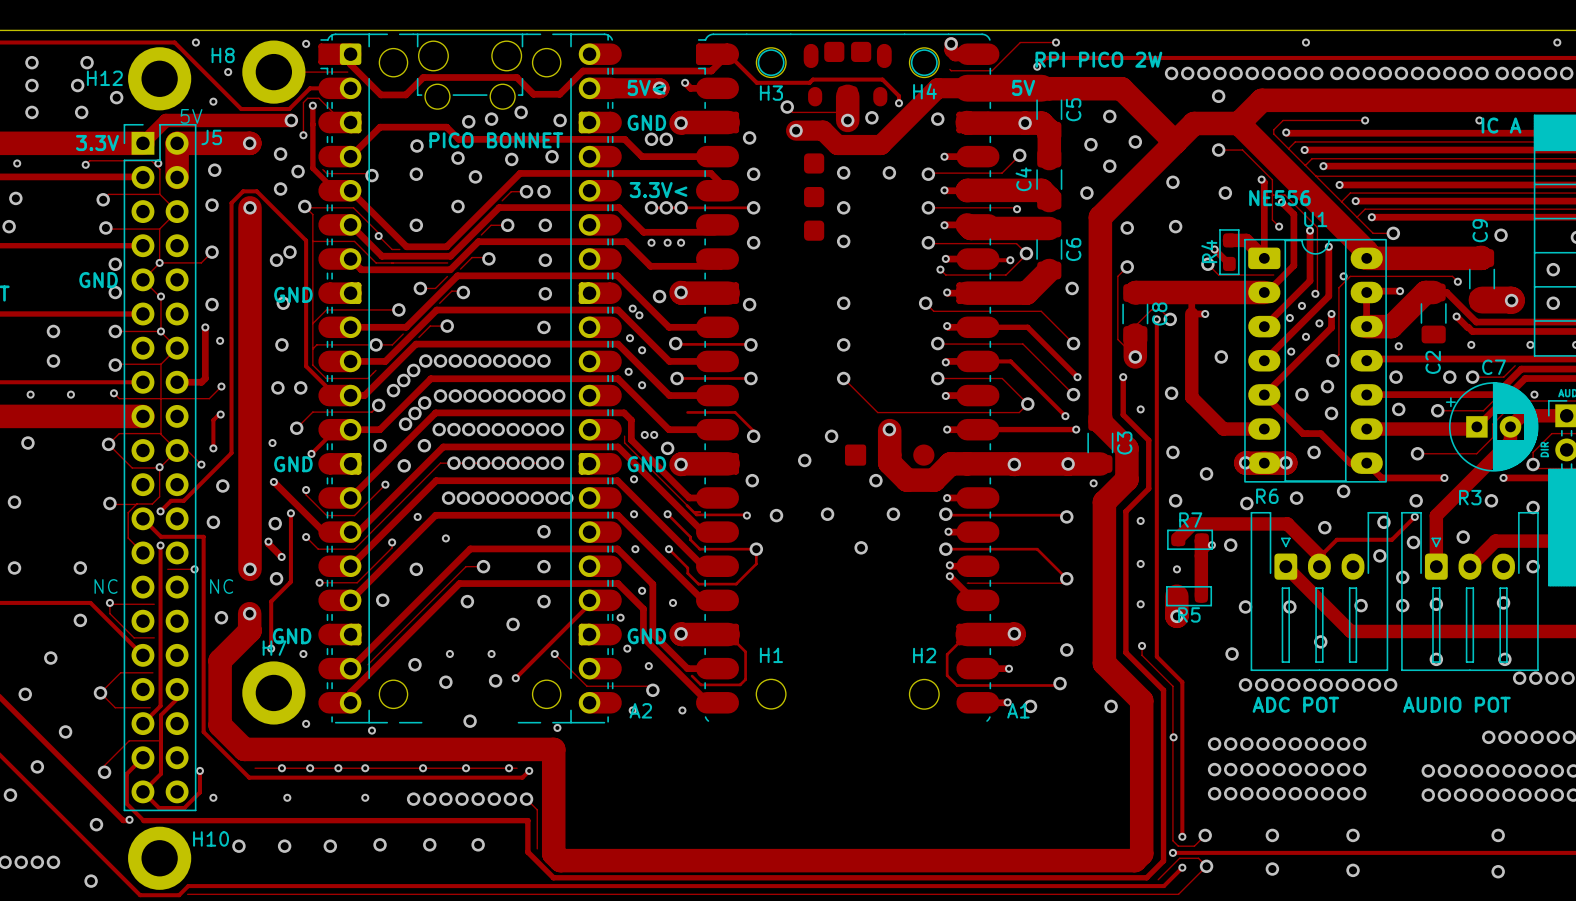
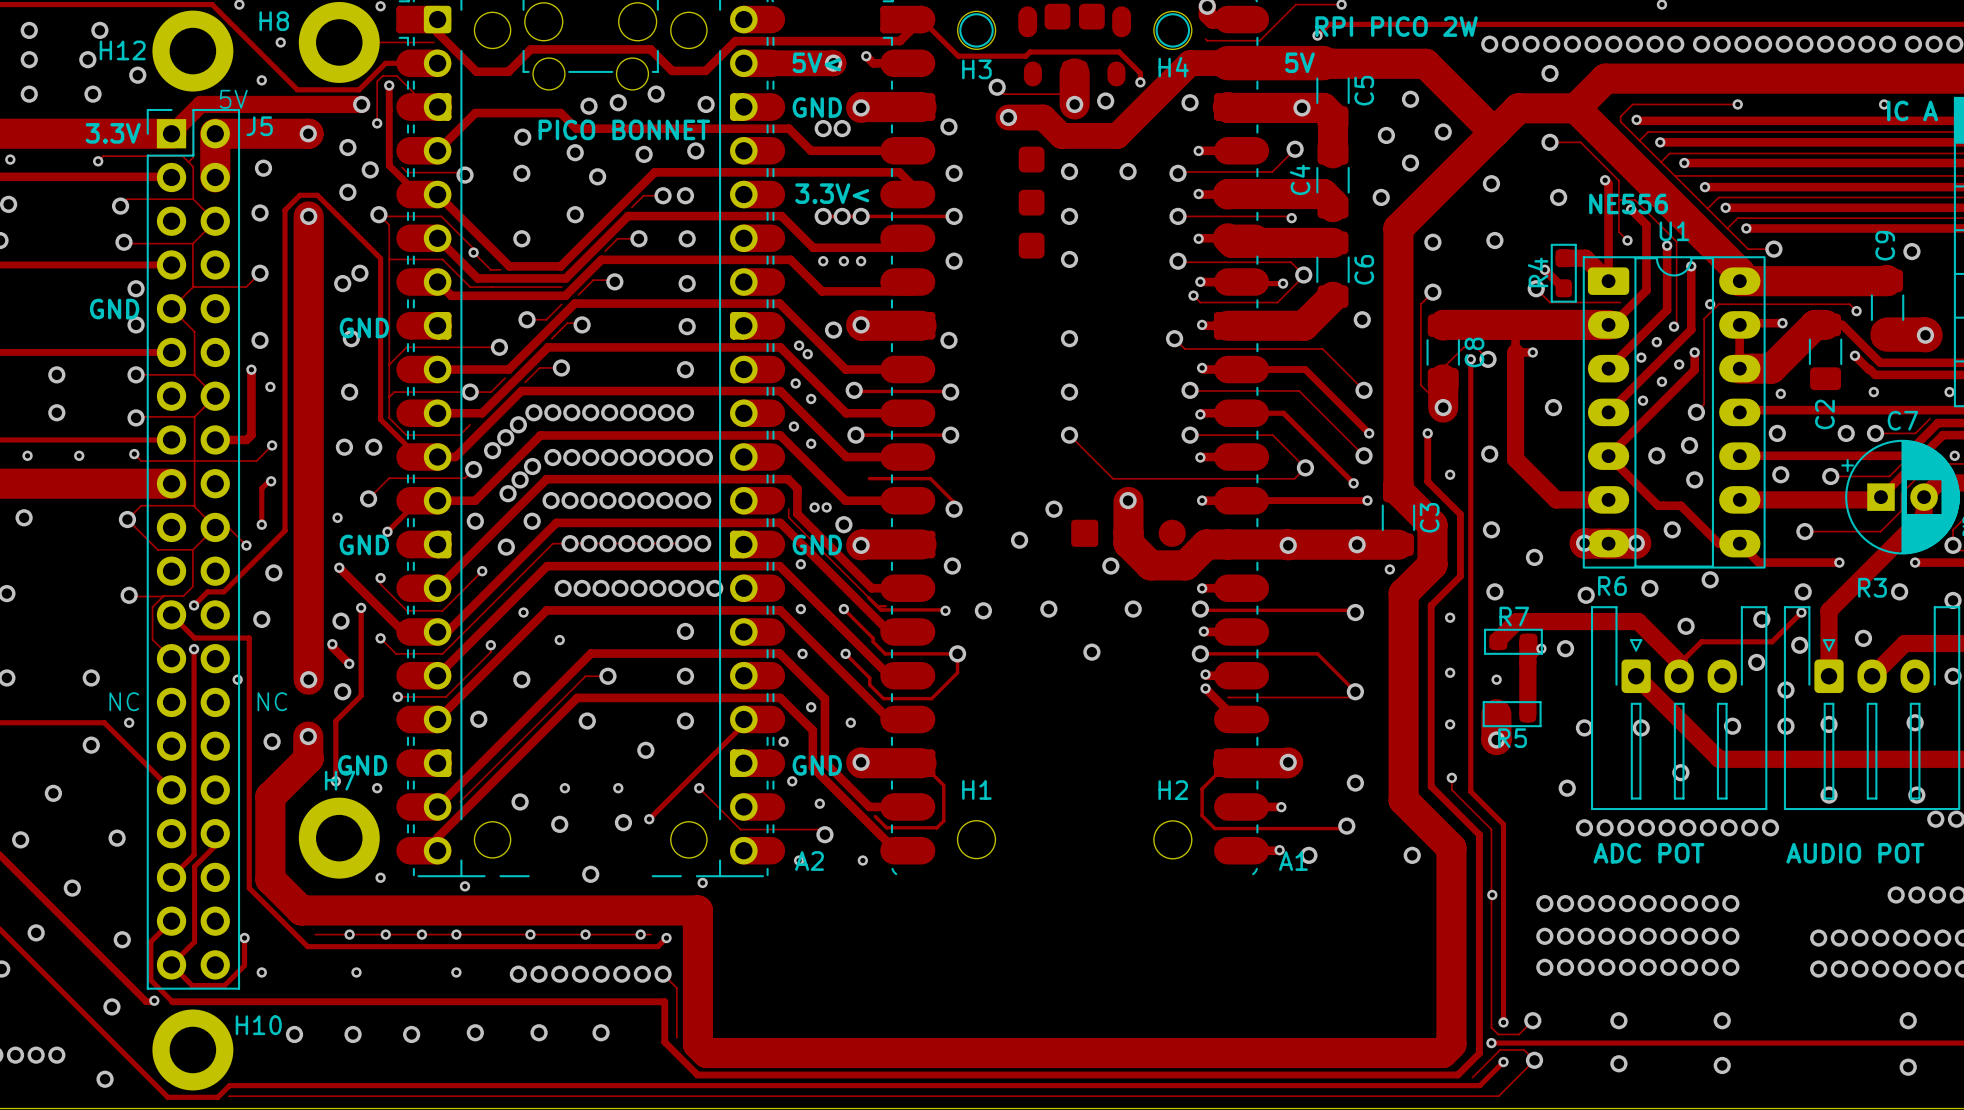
via: (158, 163) -> none
via: (159, 262) -> none
via: (160, 296) -> none
via: (160, 331) -> none
via: (159, 467) -> none
track: (167, 569) (194, 569) -> none
track: (154, 604) (109, 602) (109, 613) (134, 637) (154, 637) -> none
track: (152, 672) (120, 672) (100, 692) (115, 707) (150, 707) -> none
track: (160, 741) (129, 740) (104, 765) (104, 772) -> none

